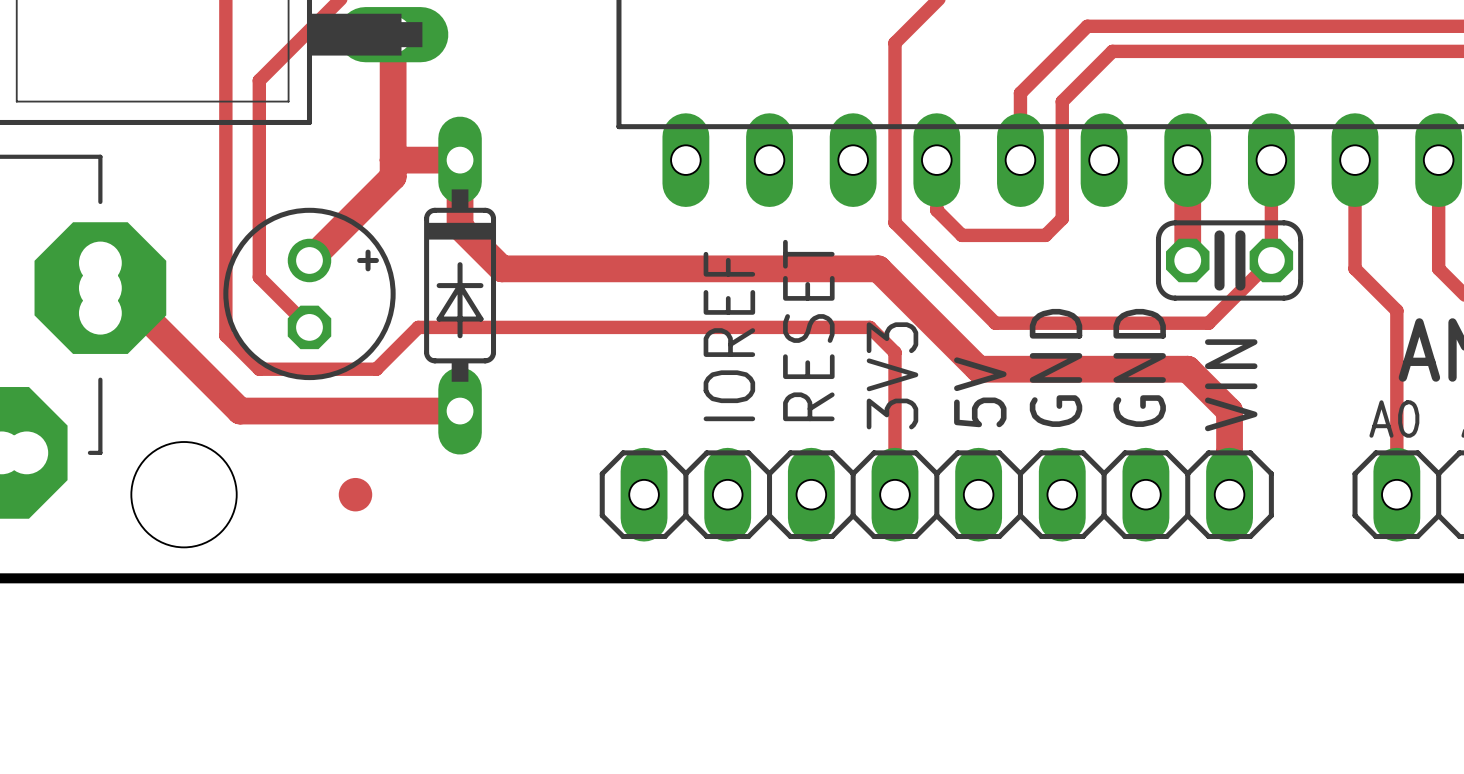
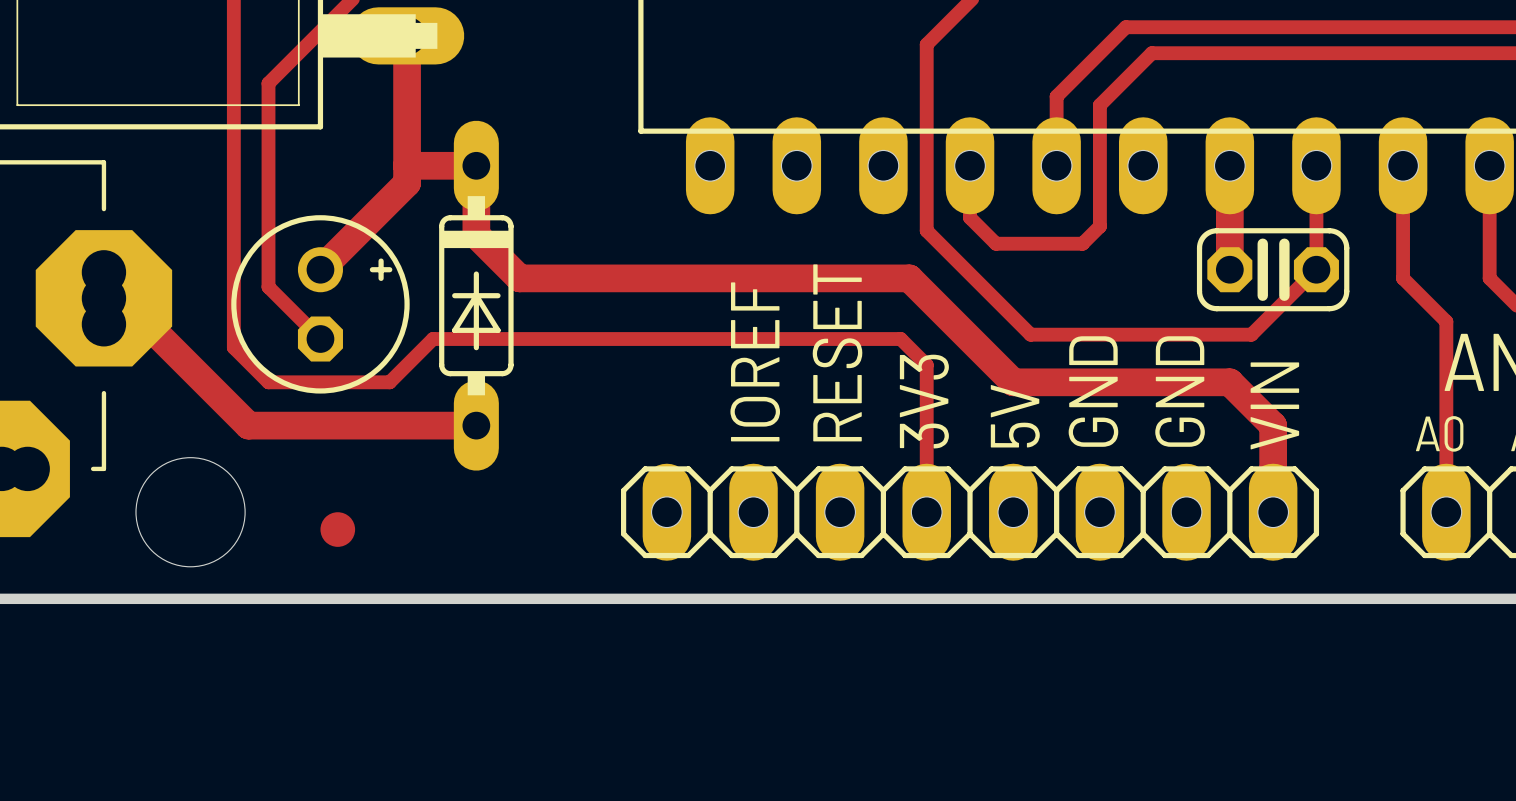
part position: (355, 494) -> (337, 529)

